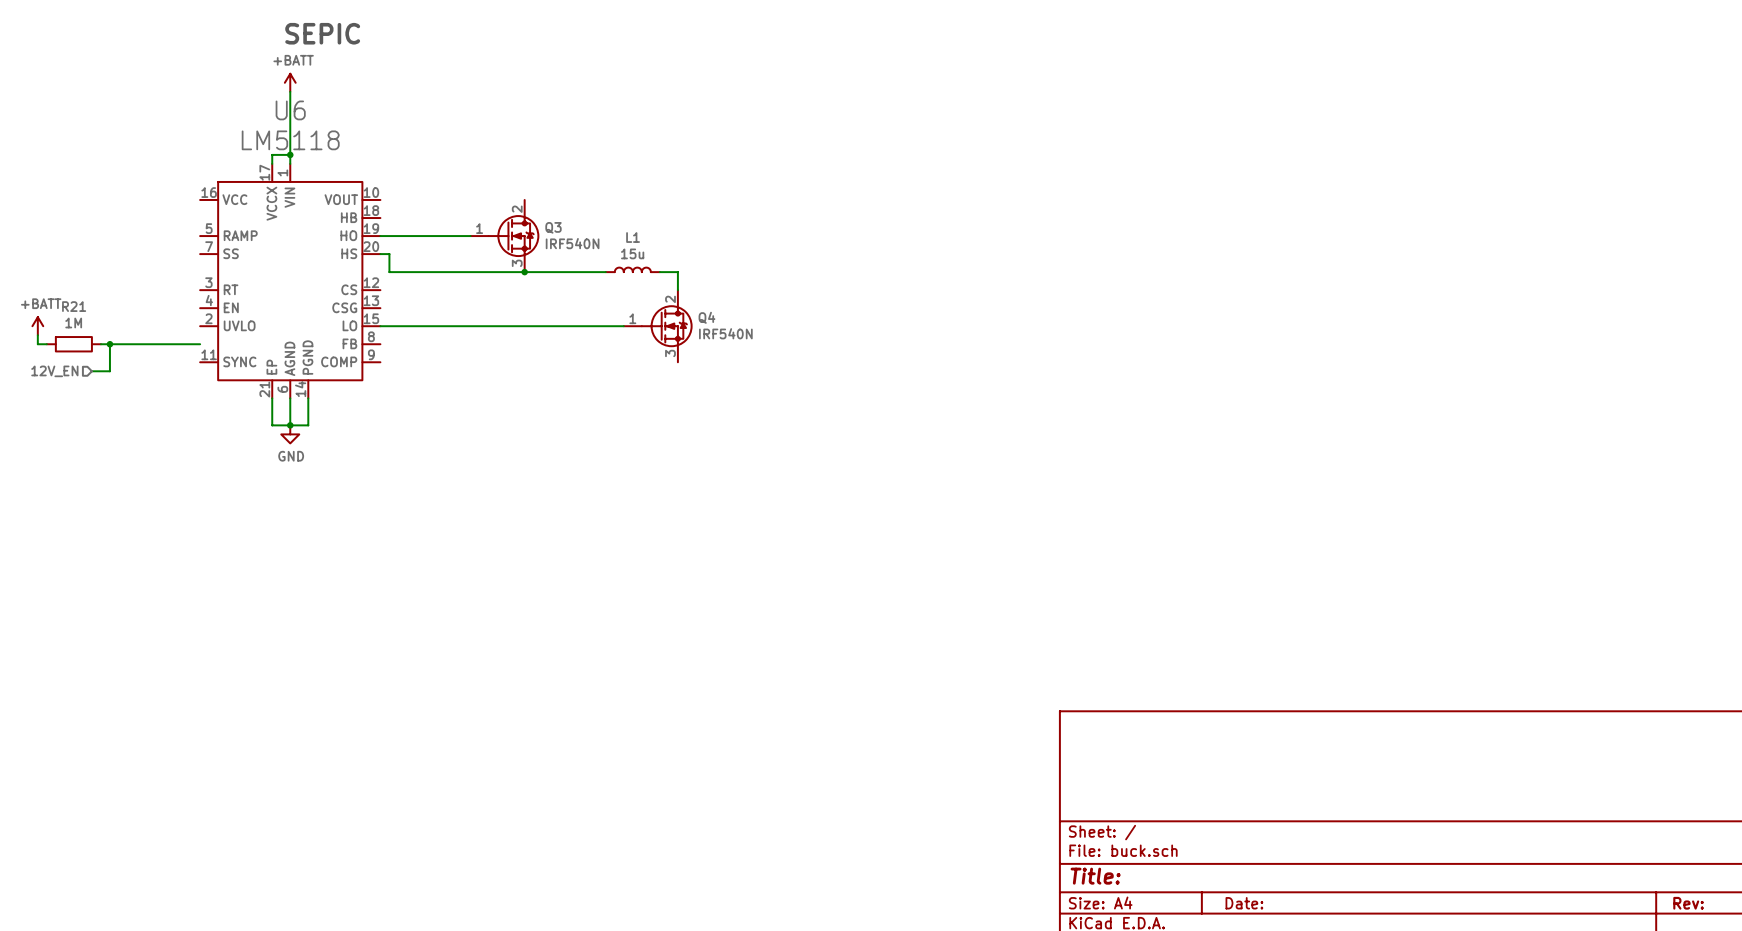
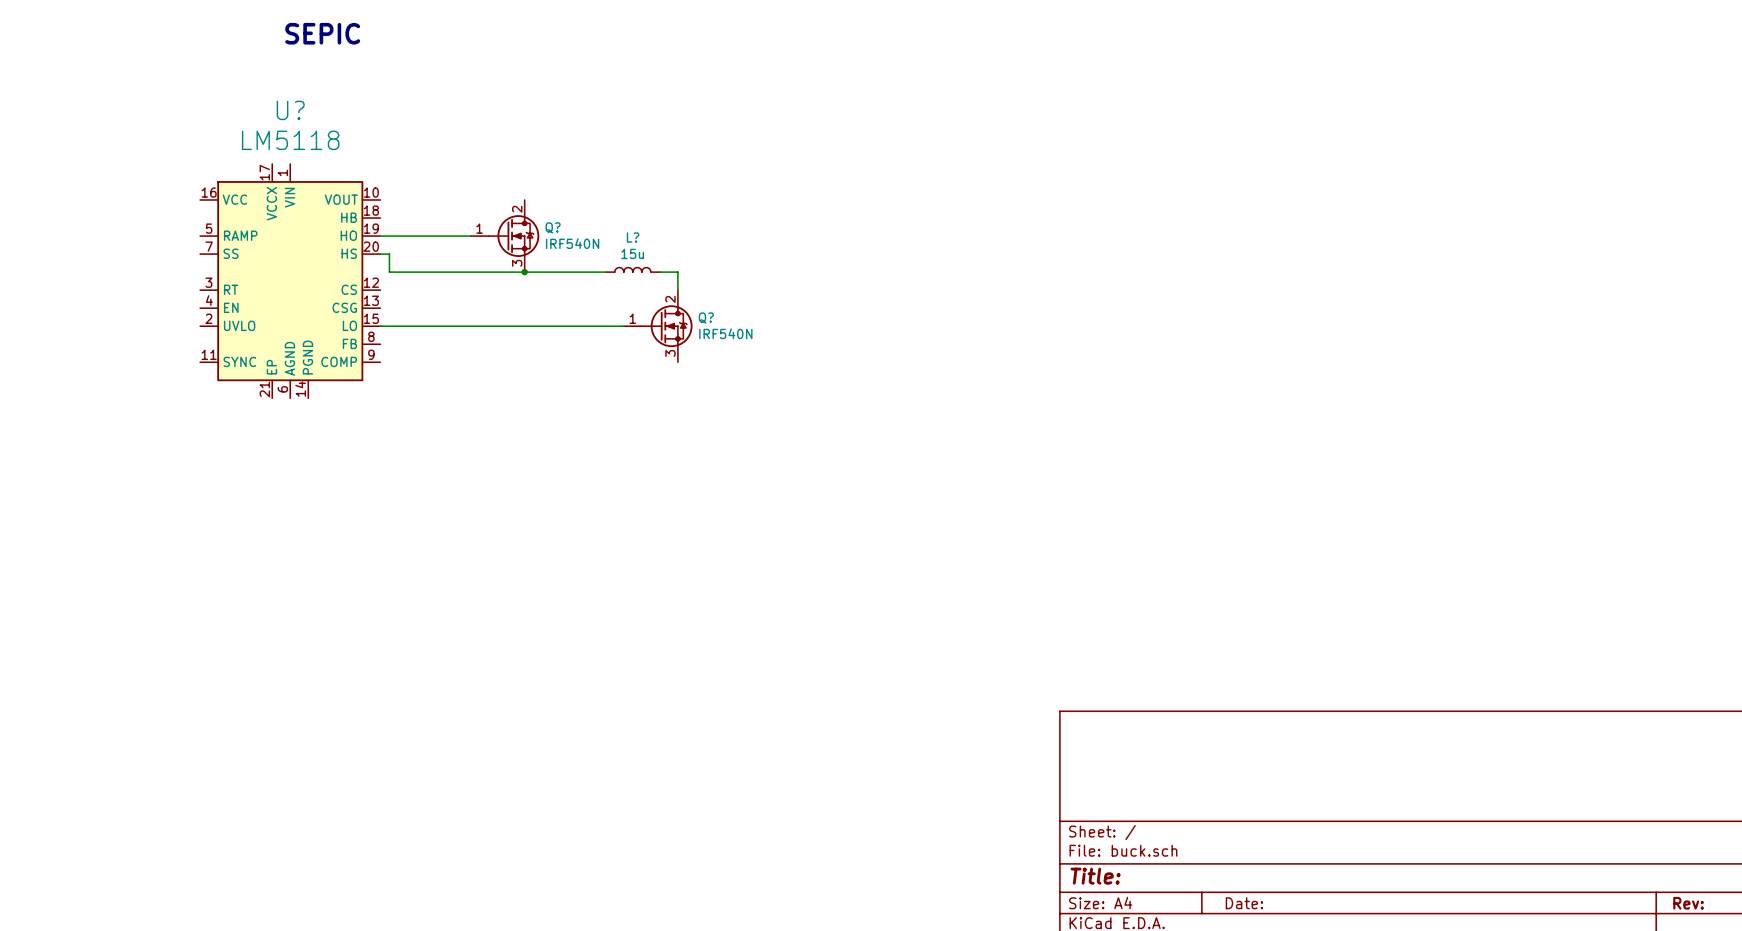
power symbol: +BATT (290, 82) -> none
wire: (290, 91) (290, 163) -> none
U6 name: U6 (290, 110) -> U? (290, 110)
wire: (290, 154) (272, 154) (272, 163) -> none
junction: (290, 154) -> none
Q3 name: Q3 (553, 227) -> Q? (553, 227)
L1 name: L1 (633, 237) -> L? (633, 237)
Q4 name: Q4 (706, 317) -> Q? (706, 318)
power symbol: +BATT (37, 326) -> none
wire: (37, 335) (37, 344) (46, 344) -> none
R21: 1M (73, 344) -> none
wire: (100, 344) (200, 344) -> none
wire: (109, 344) (109, 371) (91, 371) -> none
junction: (109, 344) -> none
hierarchical label: 12V_EN (54, 371) -> none
wire: (272, 398) (272, 425) (308, 425) (308, 398) -> none
wire: (290, 398) (290, 425) -> none
junction: (290, 425) -> none
power symbol: GND (290, 434) -> none

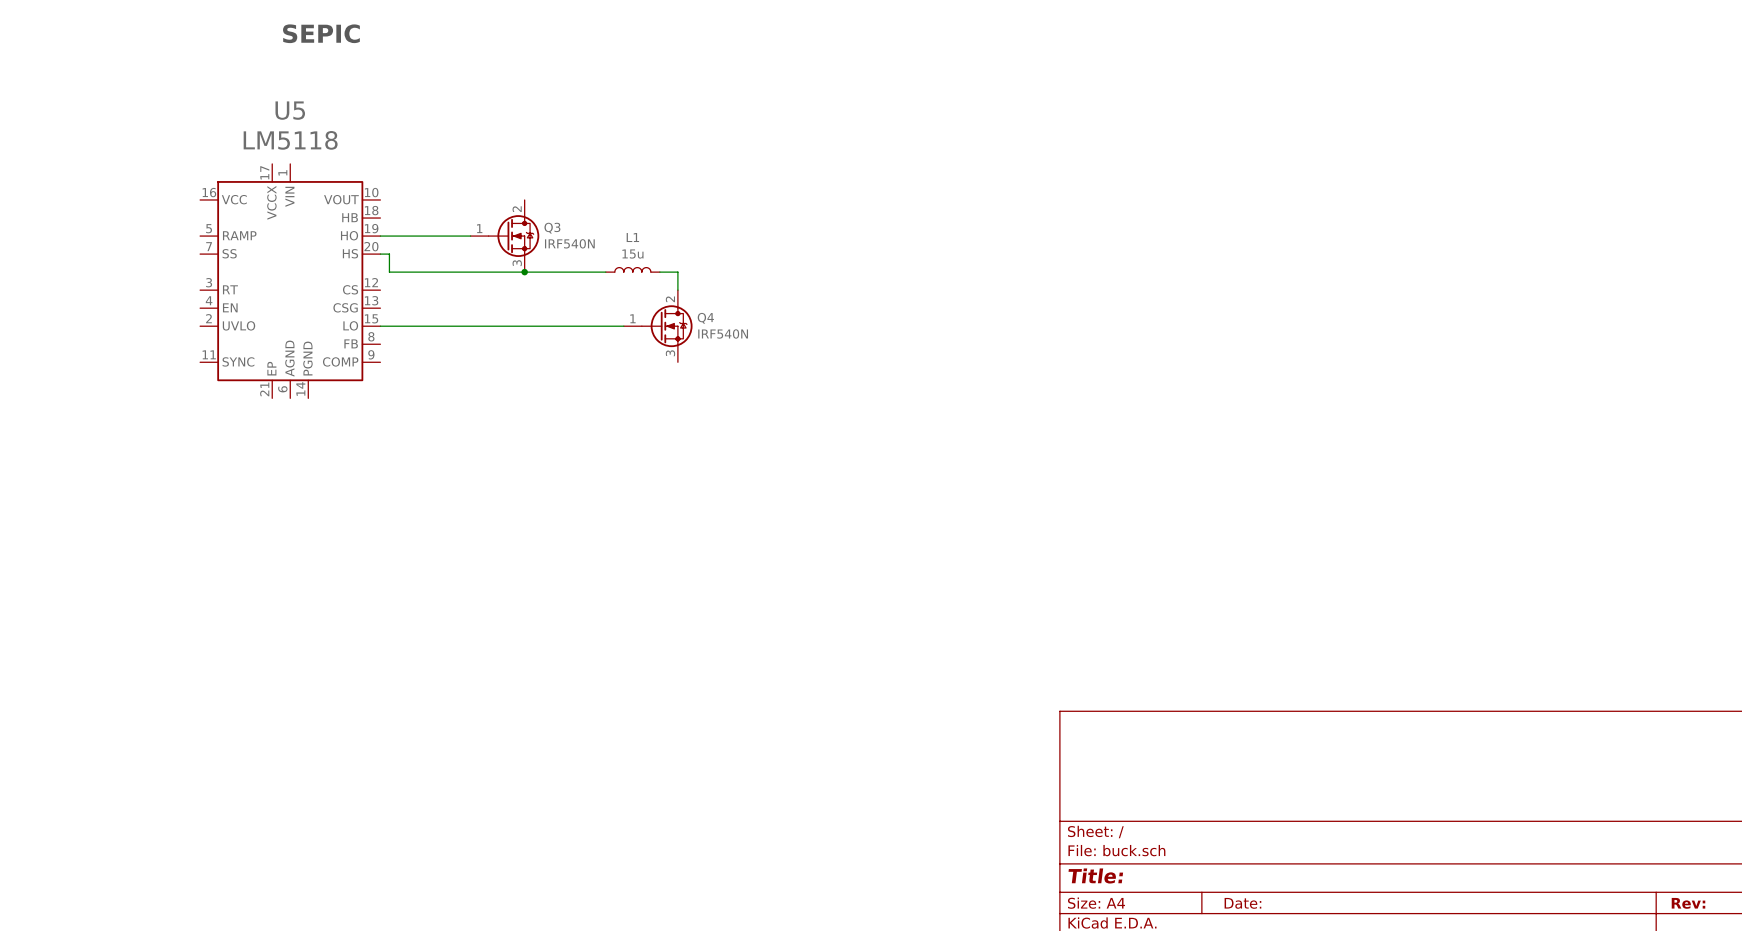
U? name: U? (290, 110) -> U5 (290, 110)
Q? name: Q? (553, 227) -> Q3 (552, 228)
L? name: L? (633, 237) -> L1 (632, 237)
Q? name: Q? (706, 318) -> Q4 (705, 318)

